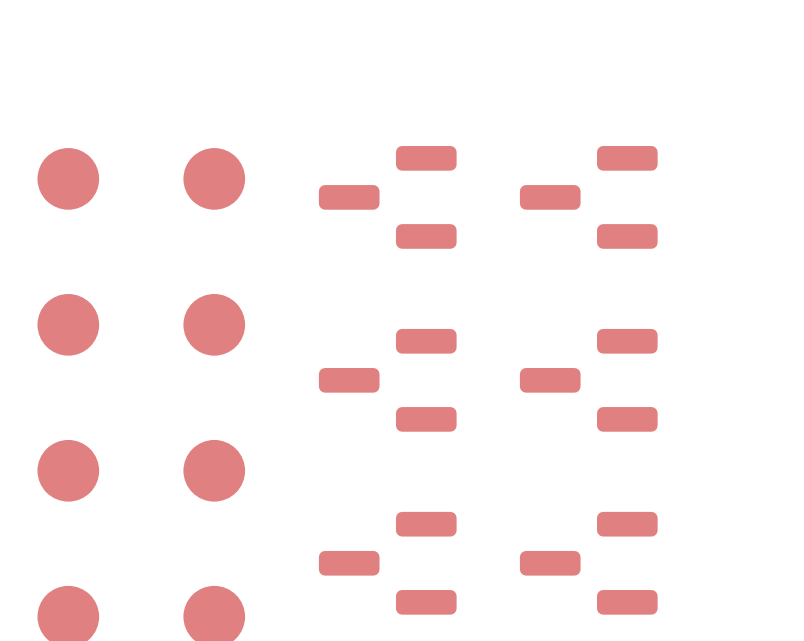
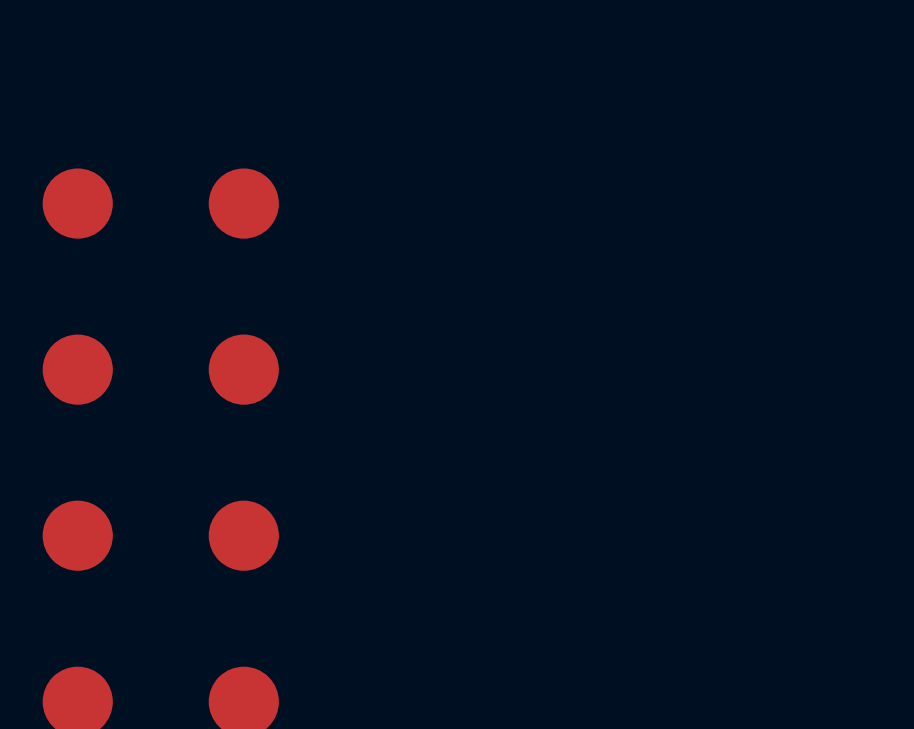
part: (387, 197) -> none
part: (588, 197) -> none
part: (387, 380) -> none
part: (588, 380) -> none
part: (387, 563) -> none
part: (588, 563) -> none

